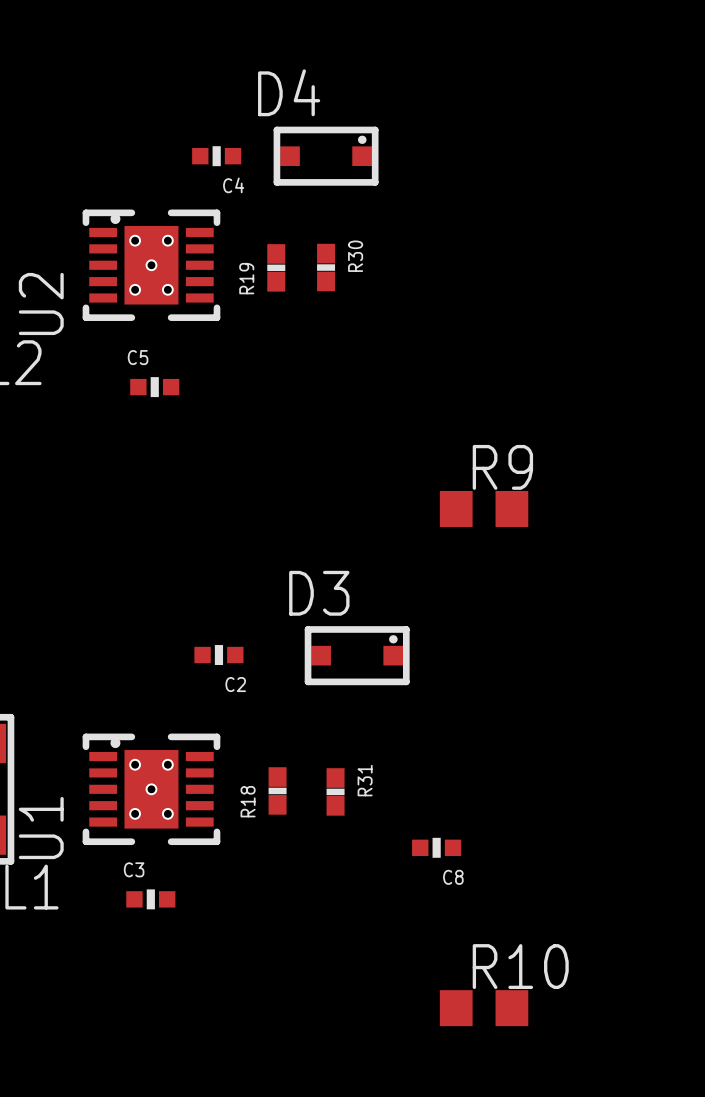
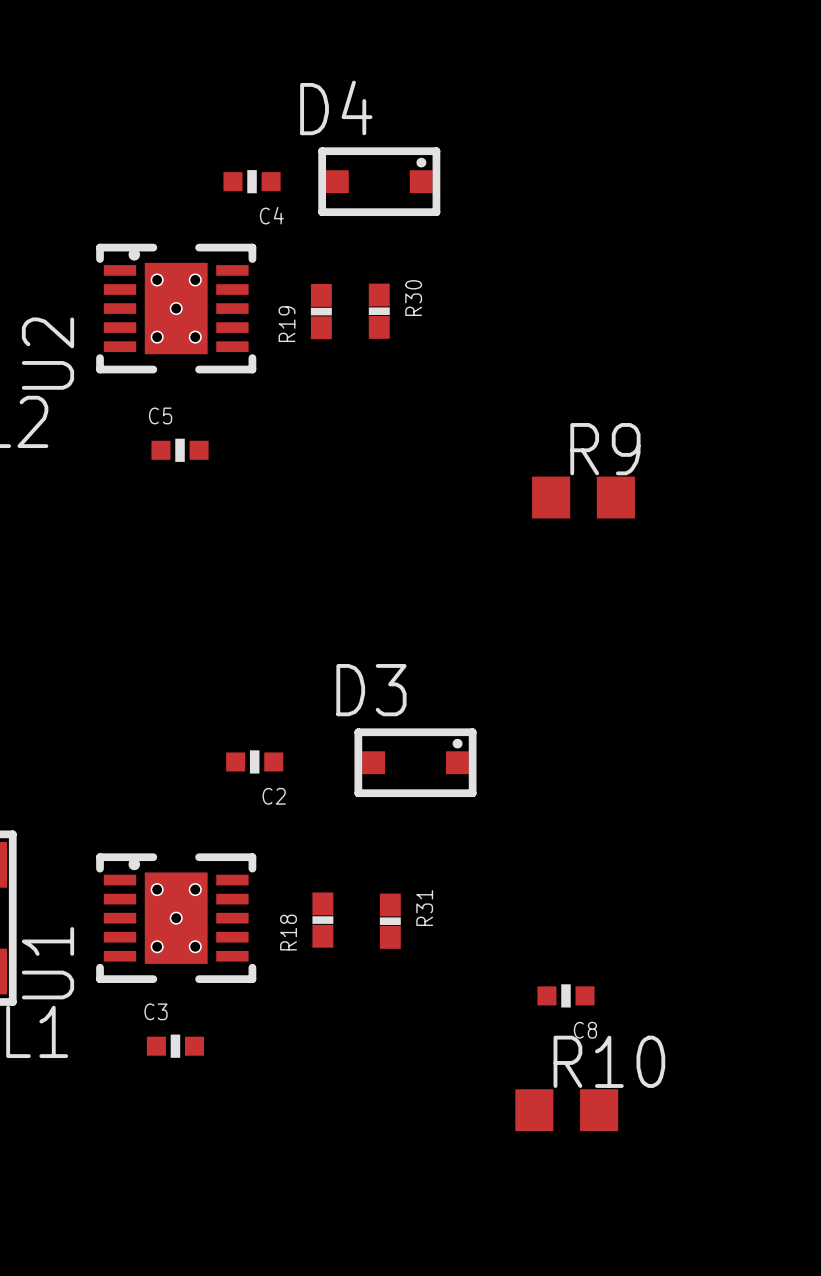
R9 position: (484, 508) -> (583, 497)
C8 position: (436, 847) -> (565, 995)
R10 position: (484, 1008) -> (566, 1110)

